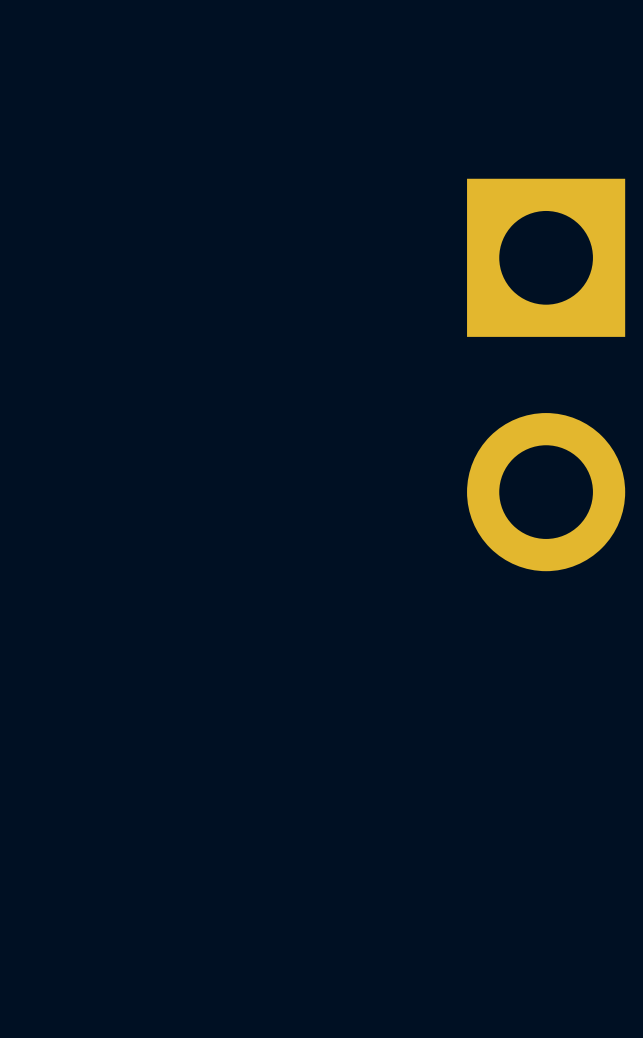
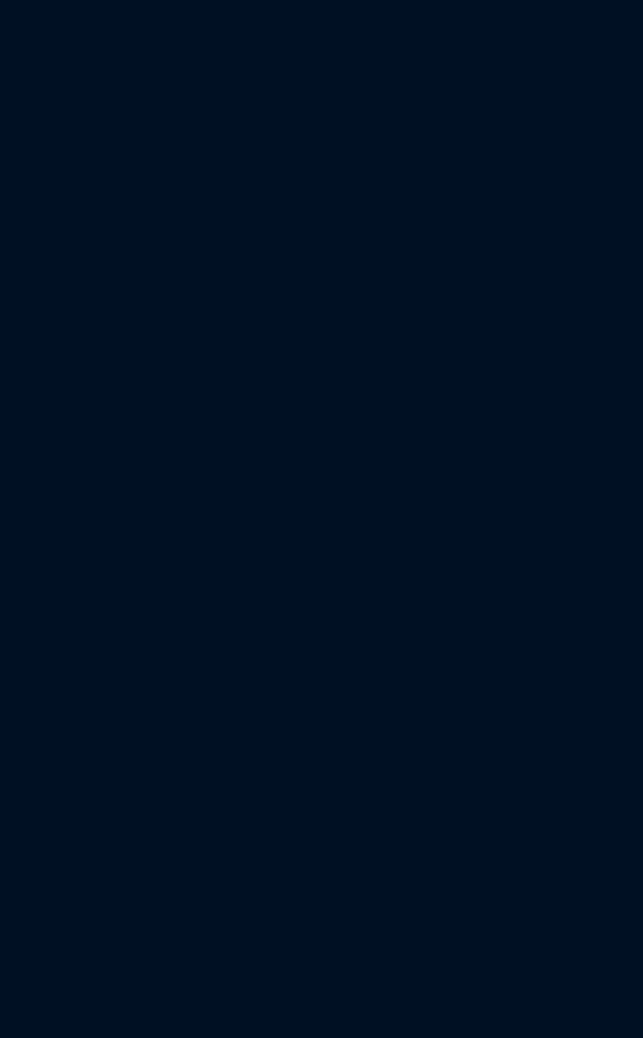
part: (546, 374) -> none

